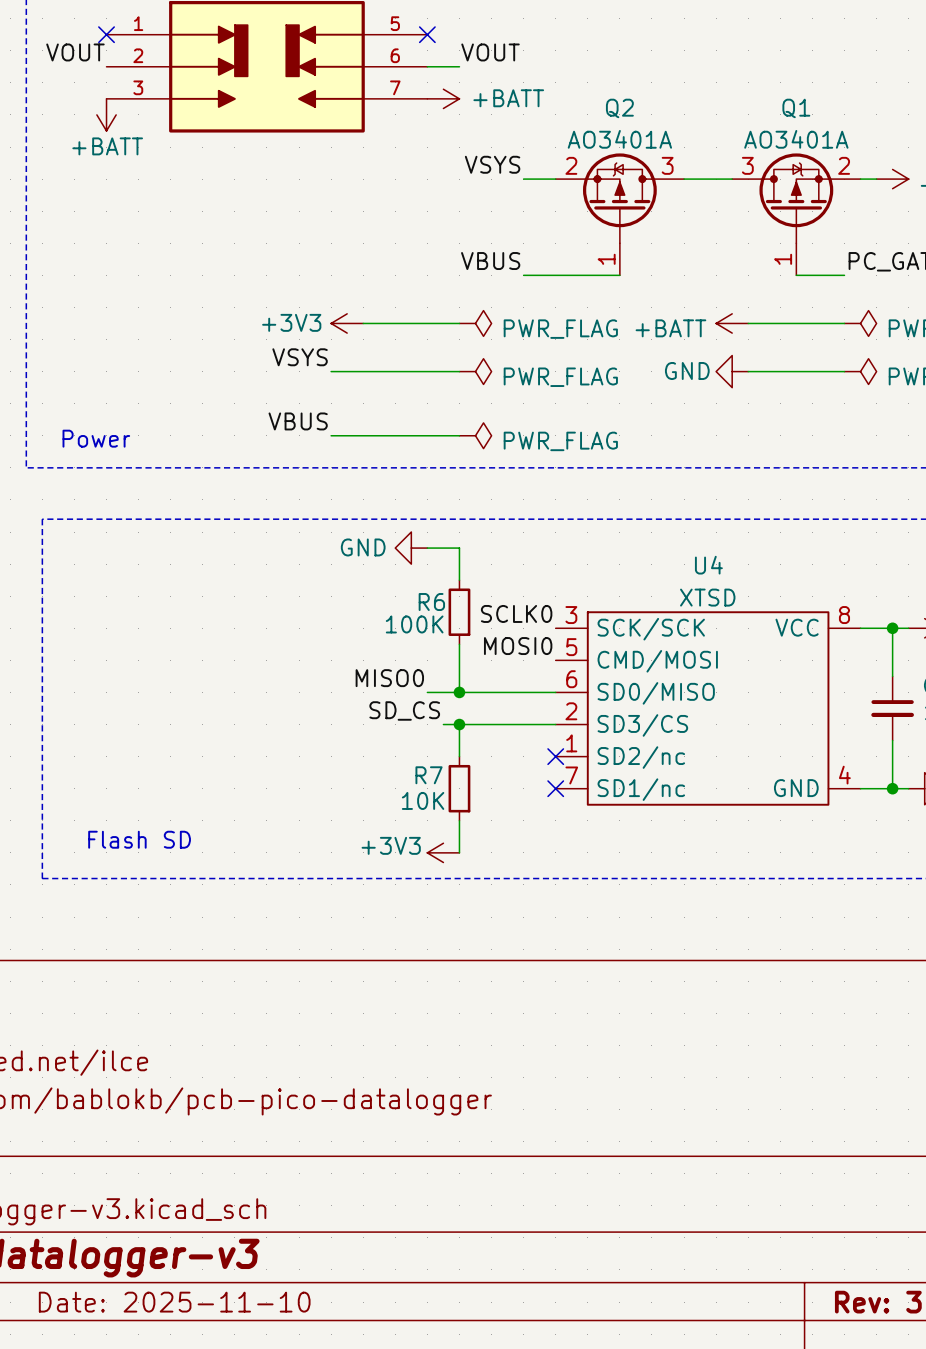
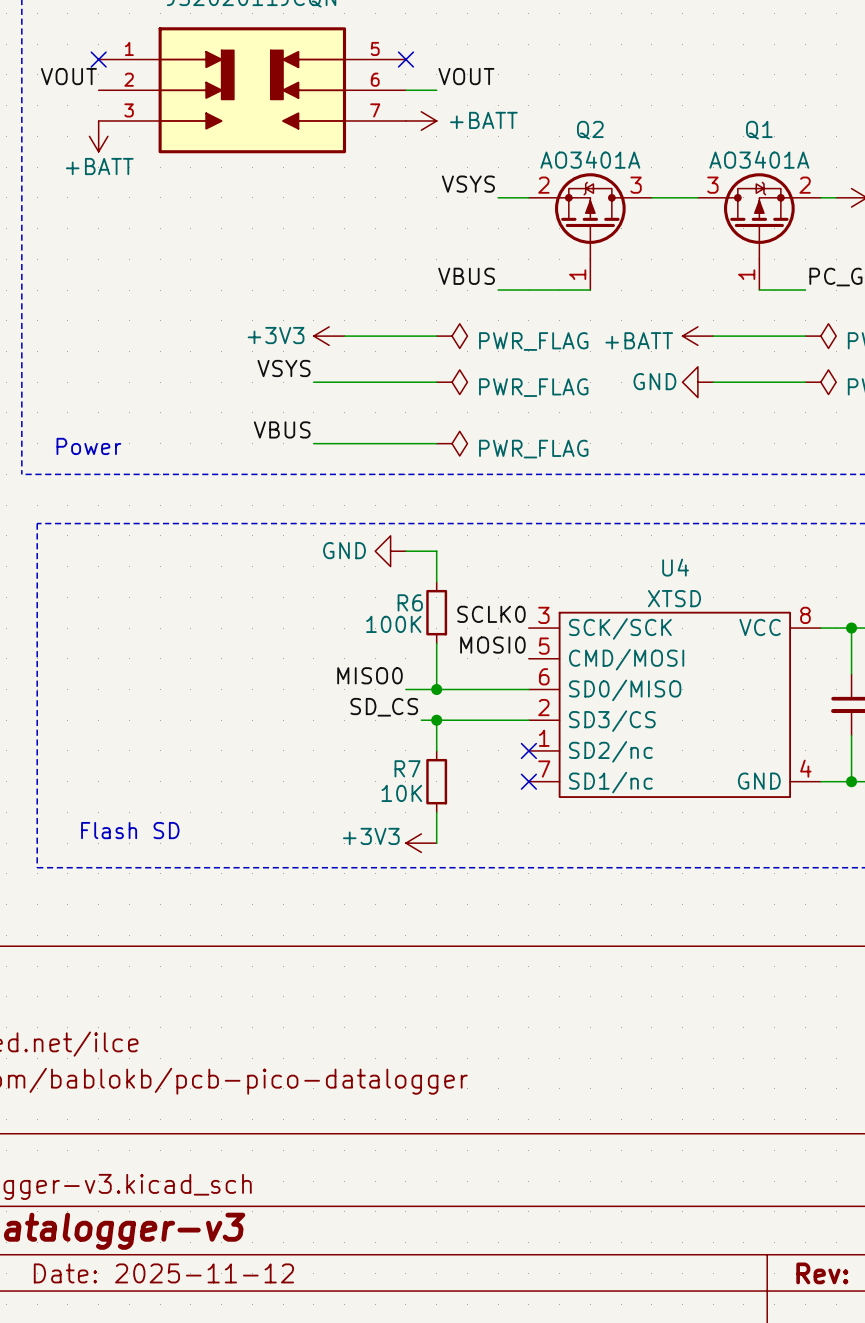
title block: Date: 2025-11-10 (174, 1302) -> Date: 2025-11-12 (163, 1273)

